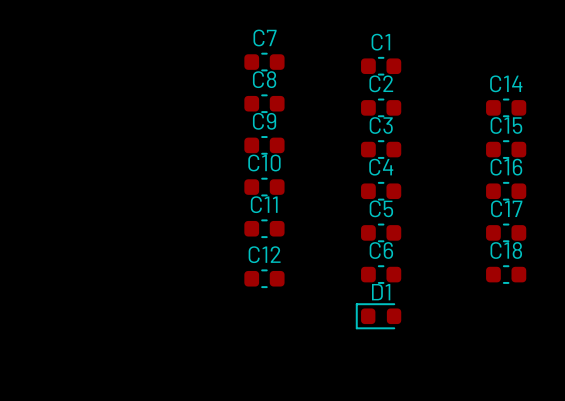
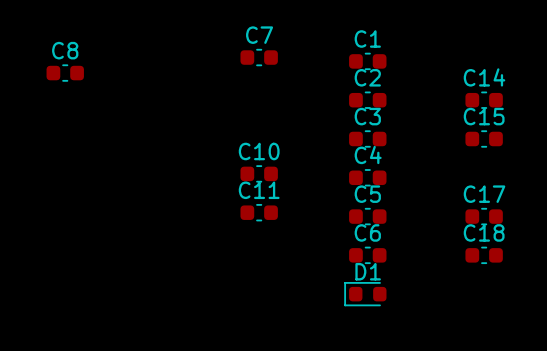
C8 position: (264, 103) -> (65, 73)
C9: (264, 145) -> none
C16: (506, 191) -> none
C12: (264, 278) -> none

